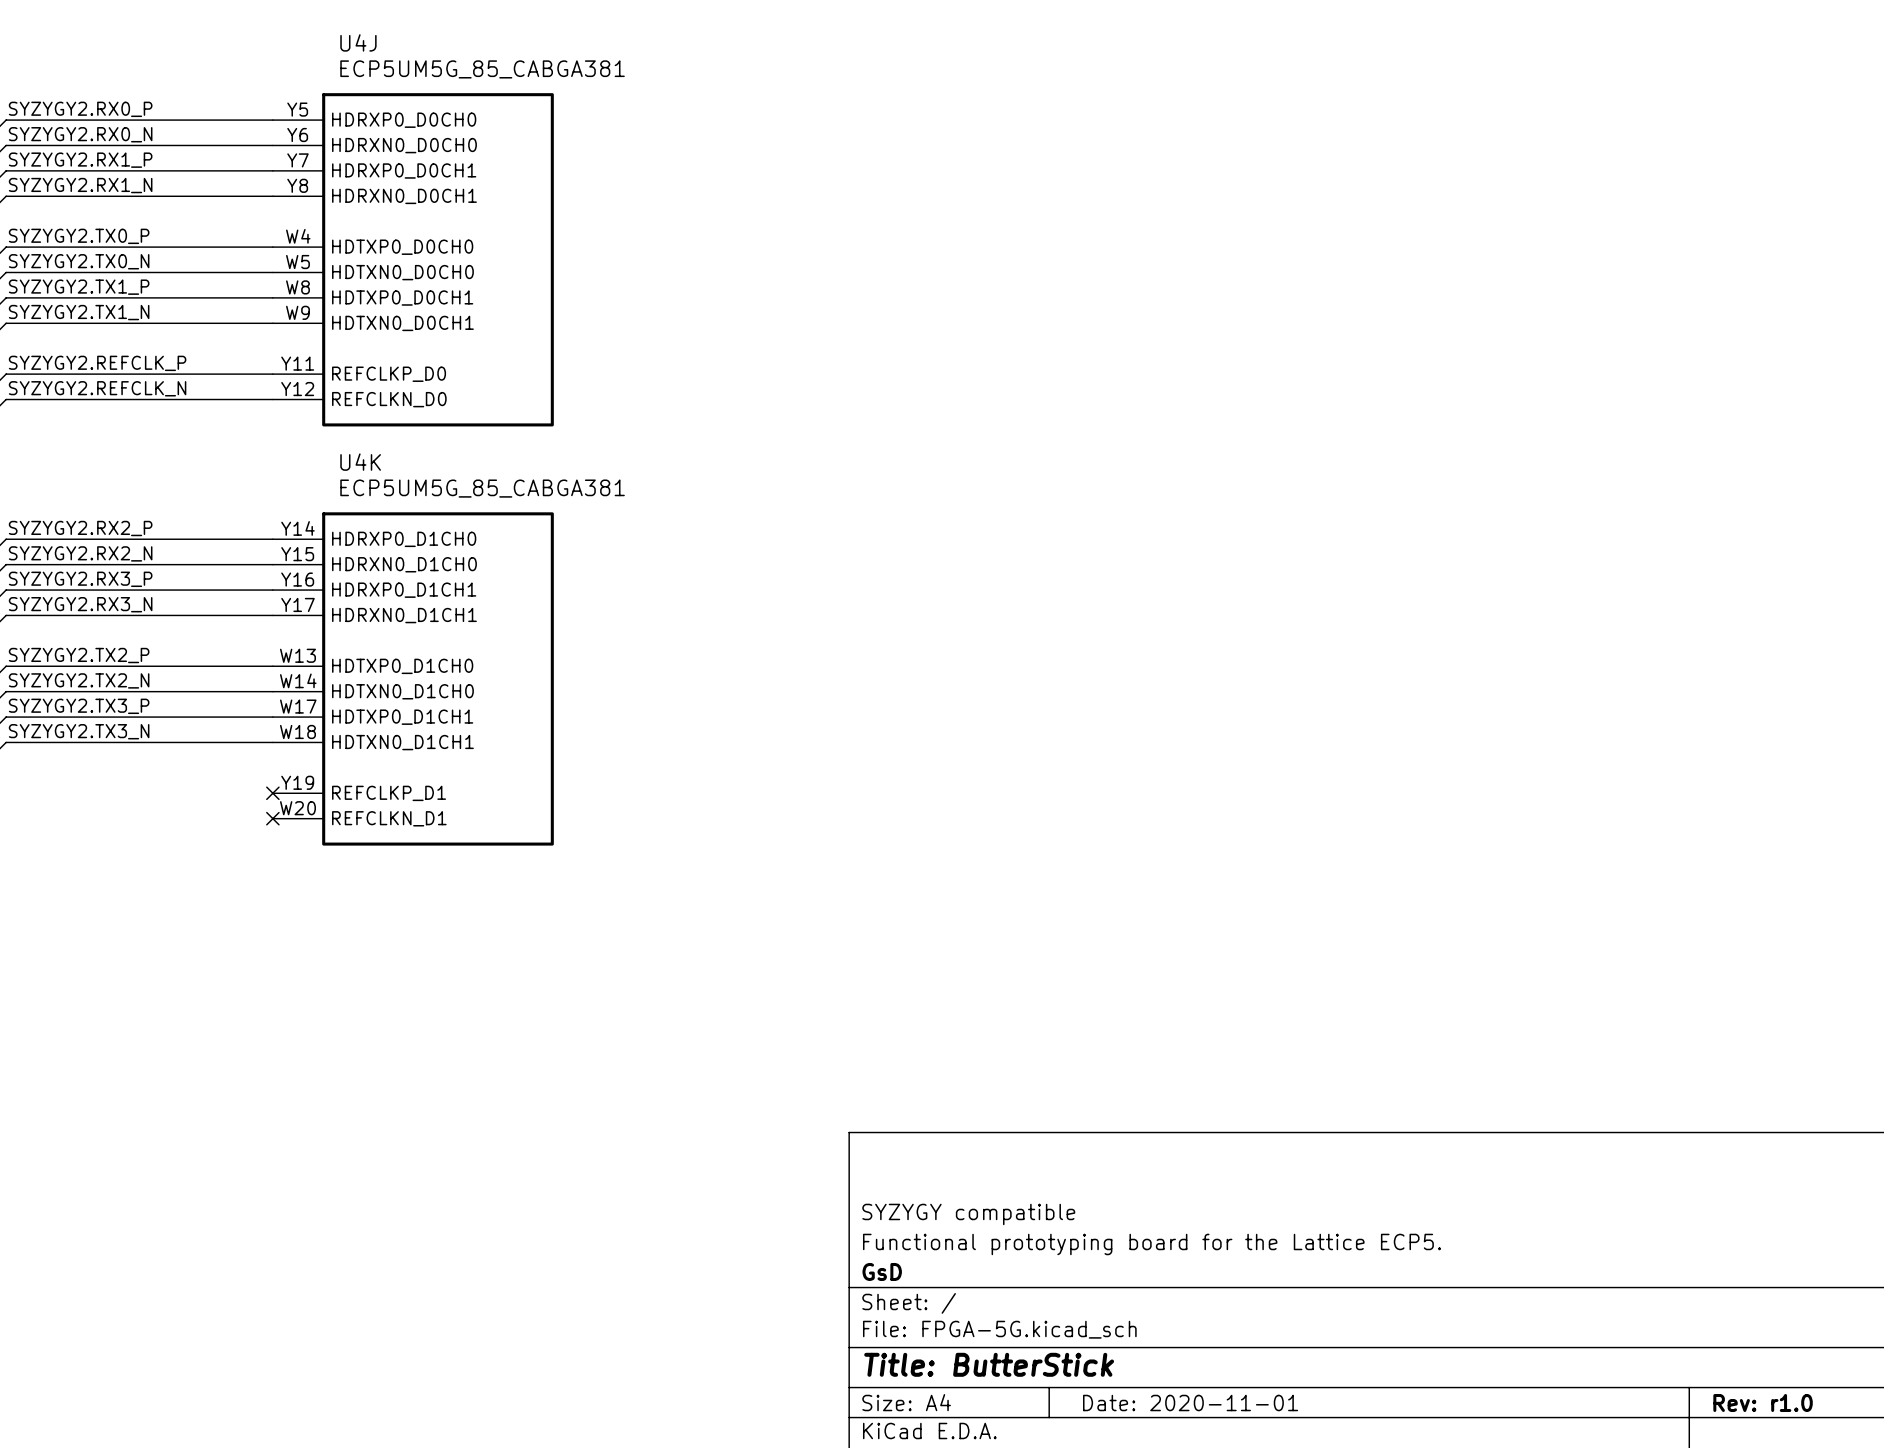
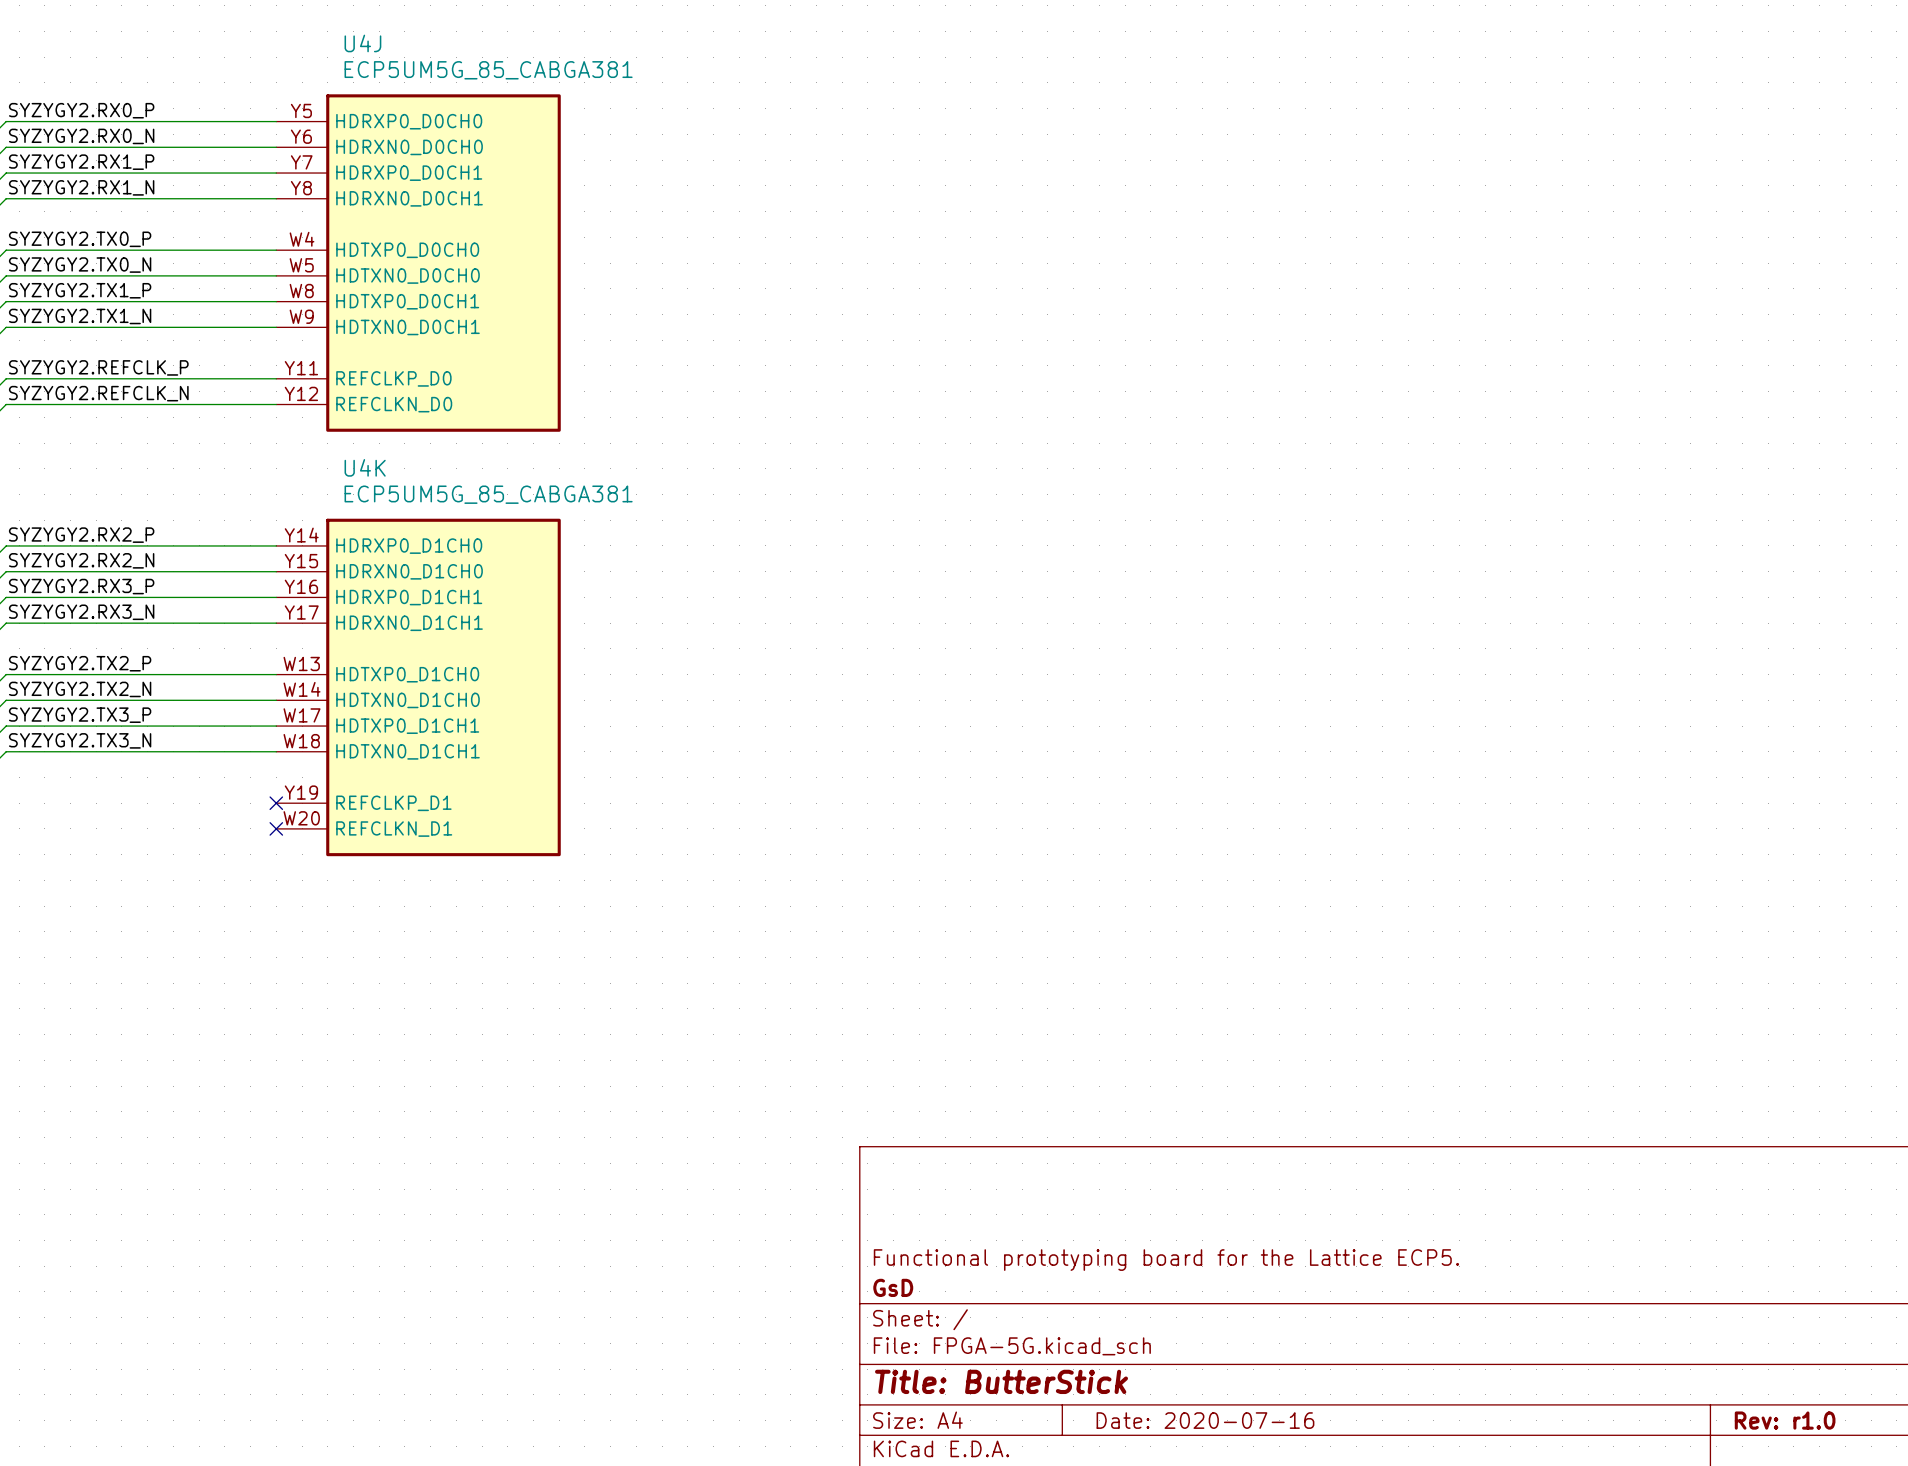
title block: SYZYGY compatible (968, 1214) -> none
title block: Date: 2020-11-01 (1190, 1403) -> Date: 2020-07-16 (1205, 1420)

